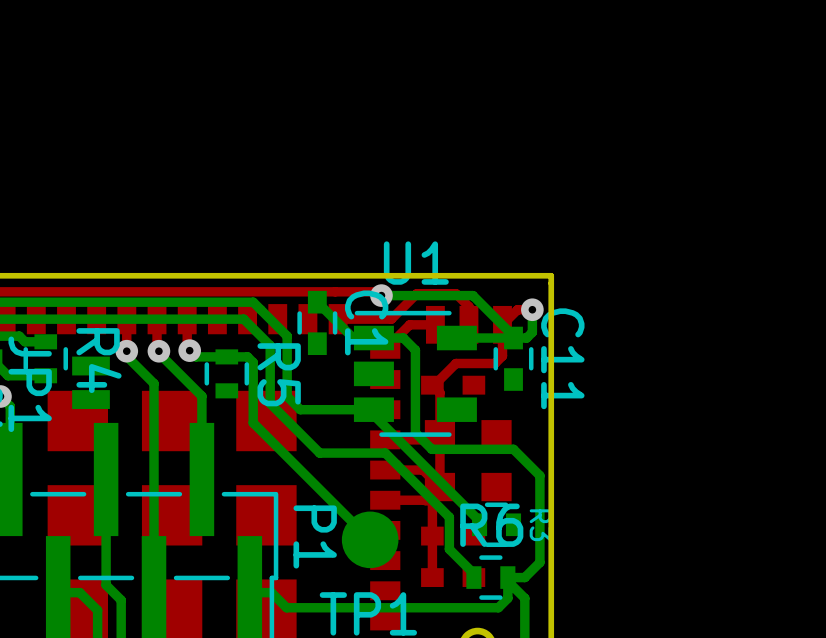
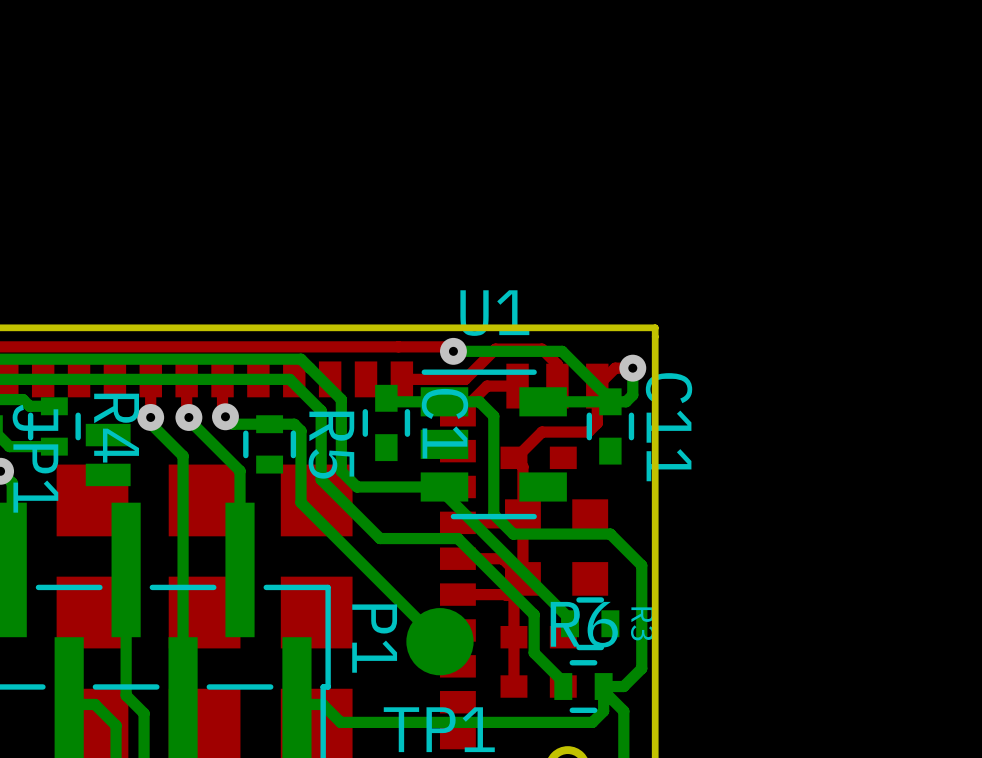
bottom track: (317, 302) (353, 338) -> (386, 398) (389, 401) (419, 401)
C1 position: (317, 322) -> (386, 422)

